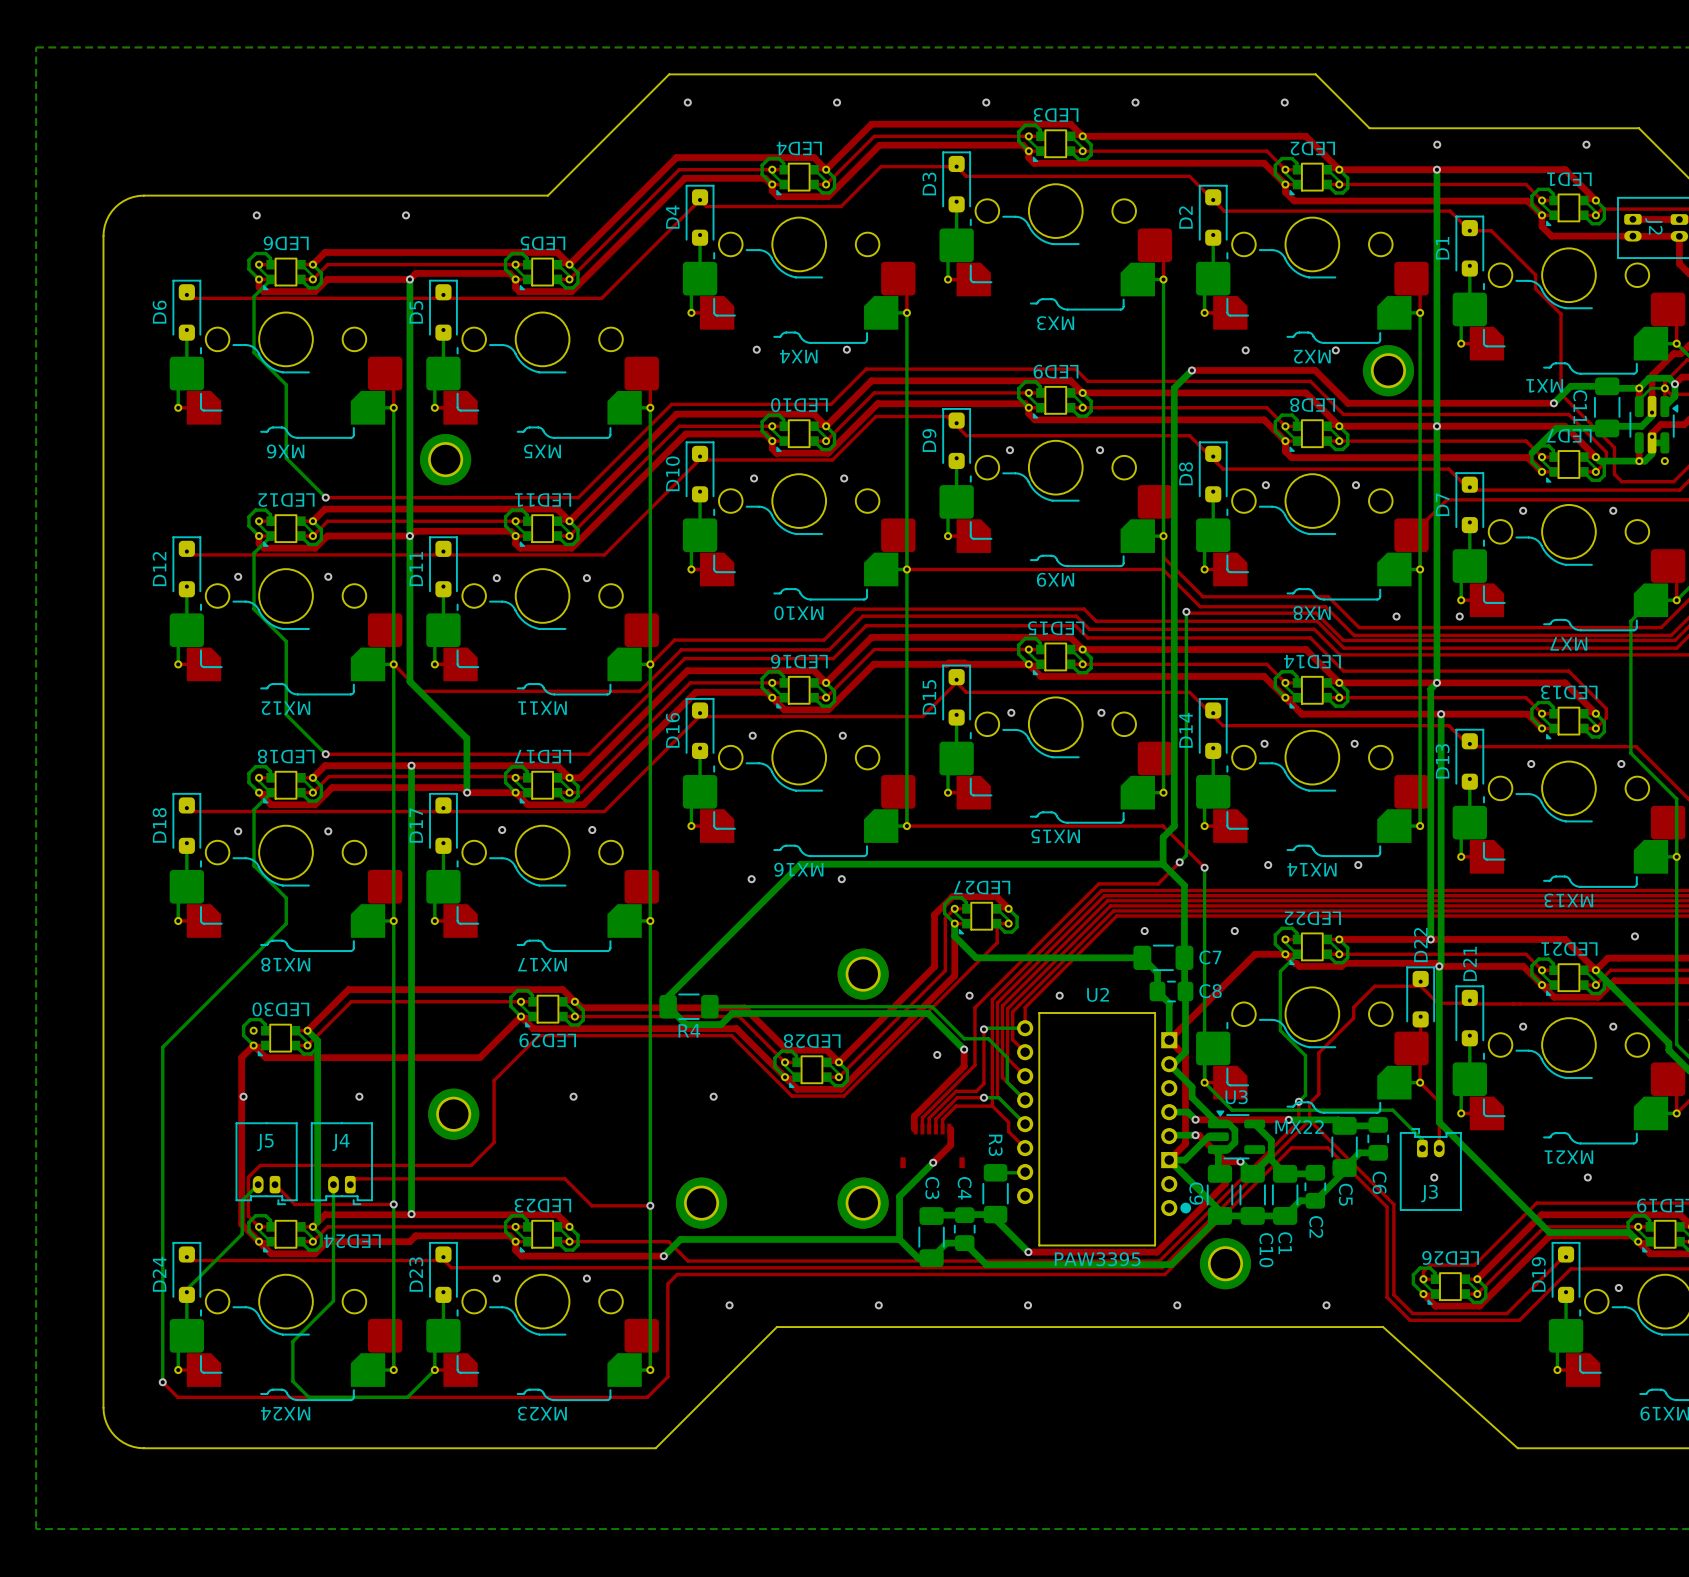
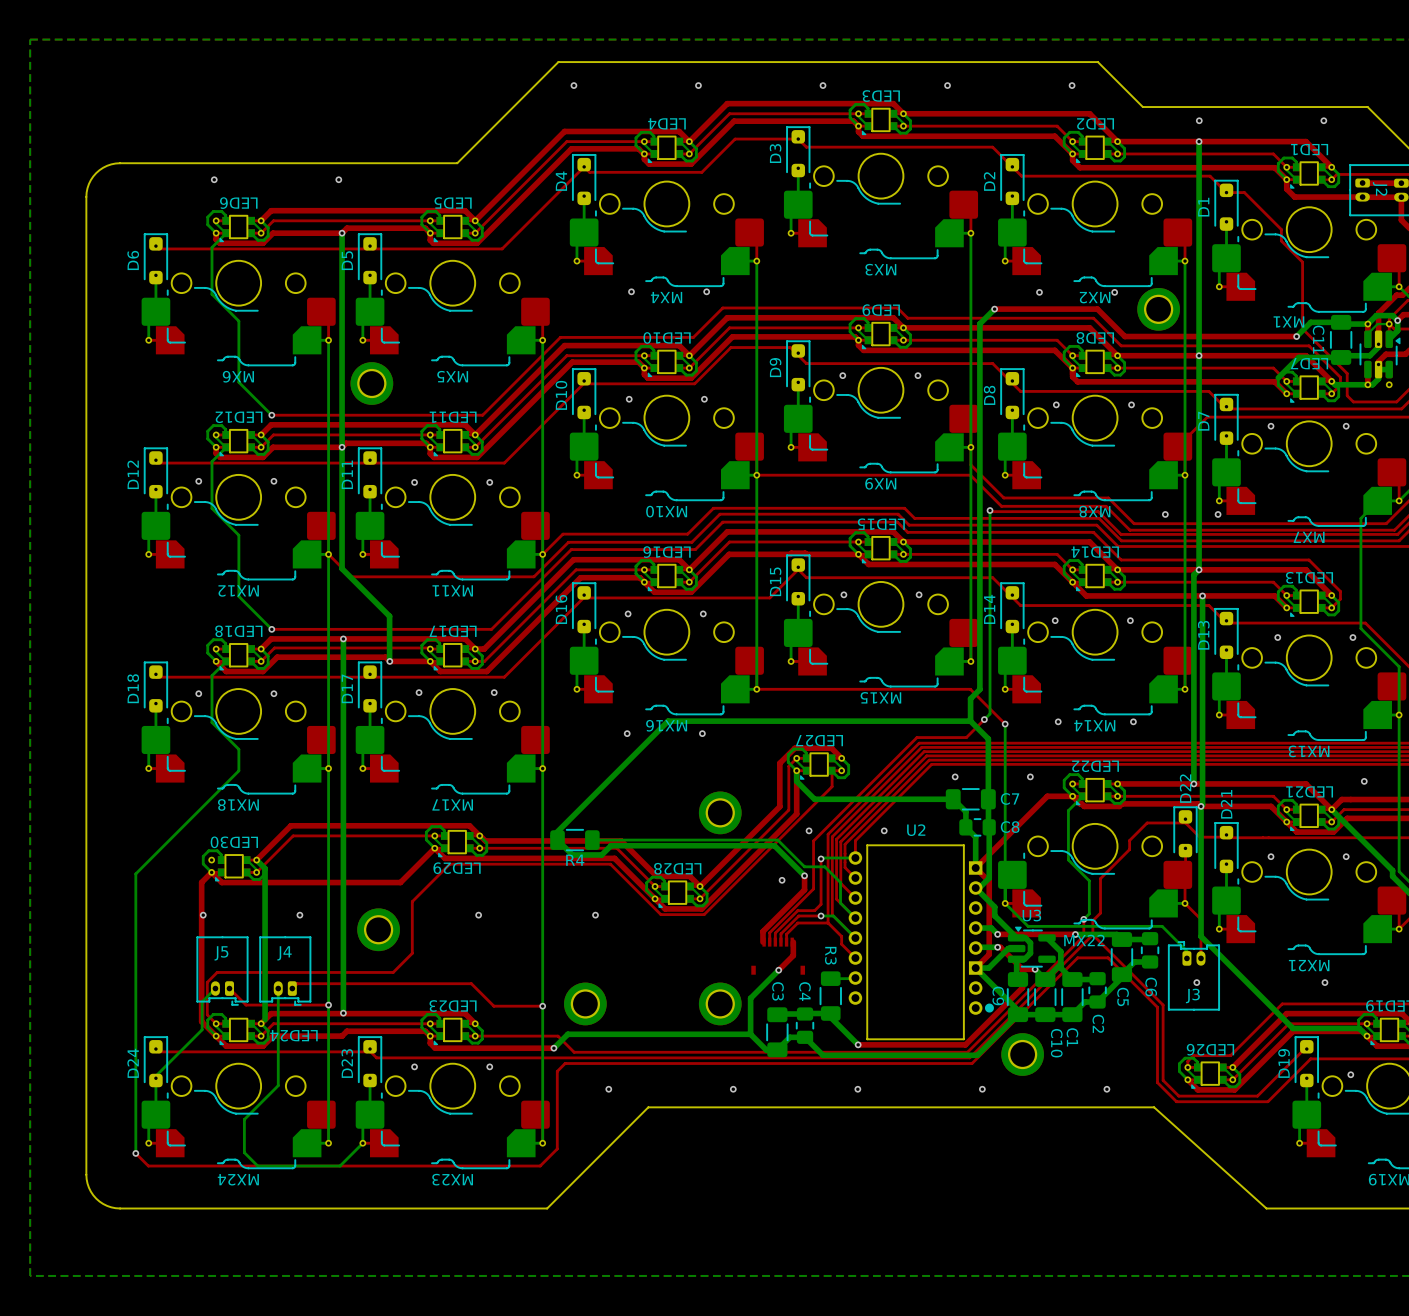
U2 value: PAW3395 (1097, 1259) -> none

